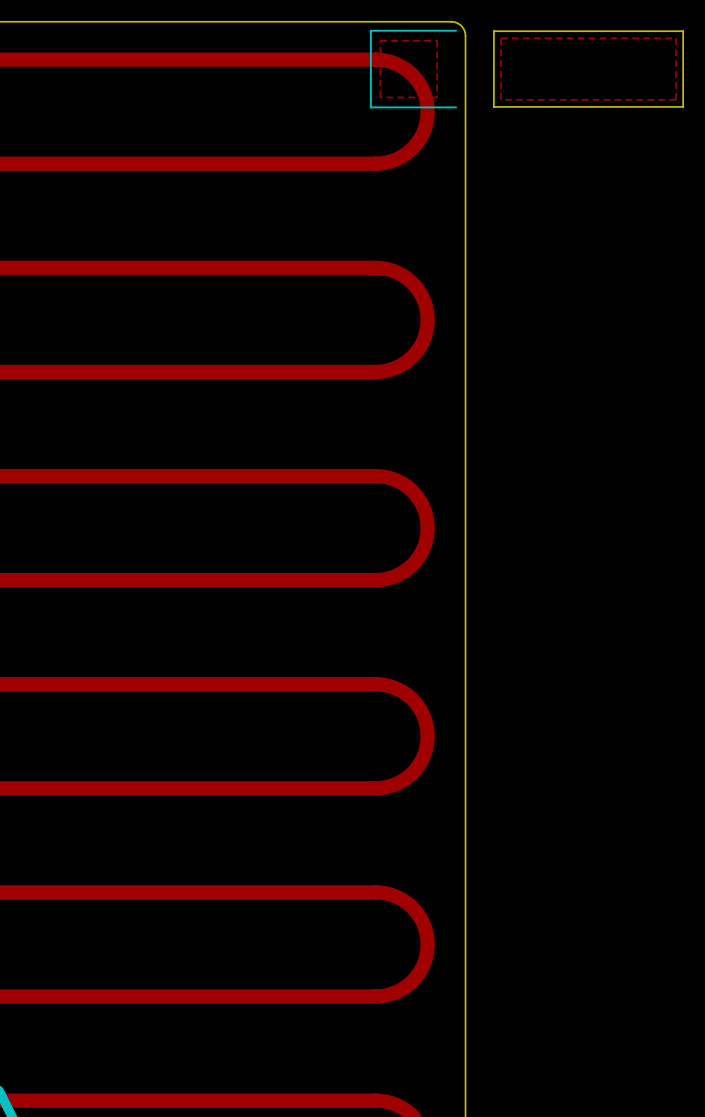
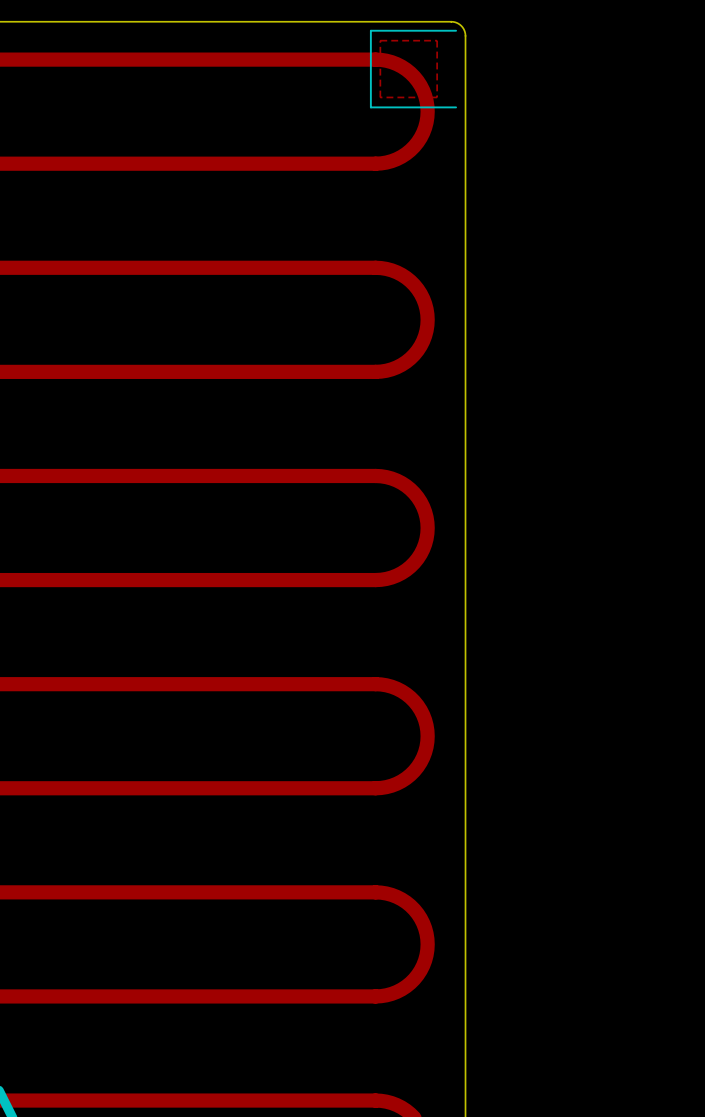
board edge: (493, 31) (683, 31) (683, 106) (493, 106) (493, 31) -> none
zone outline: (501, 38) (501, 99) (676, 99) (676, 38) (501, 38) -> none

